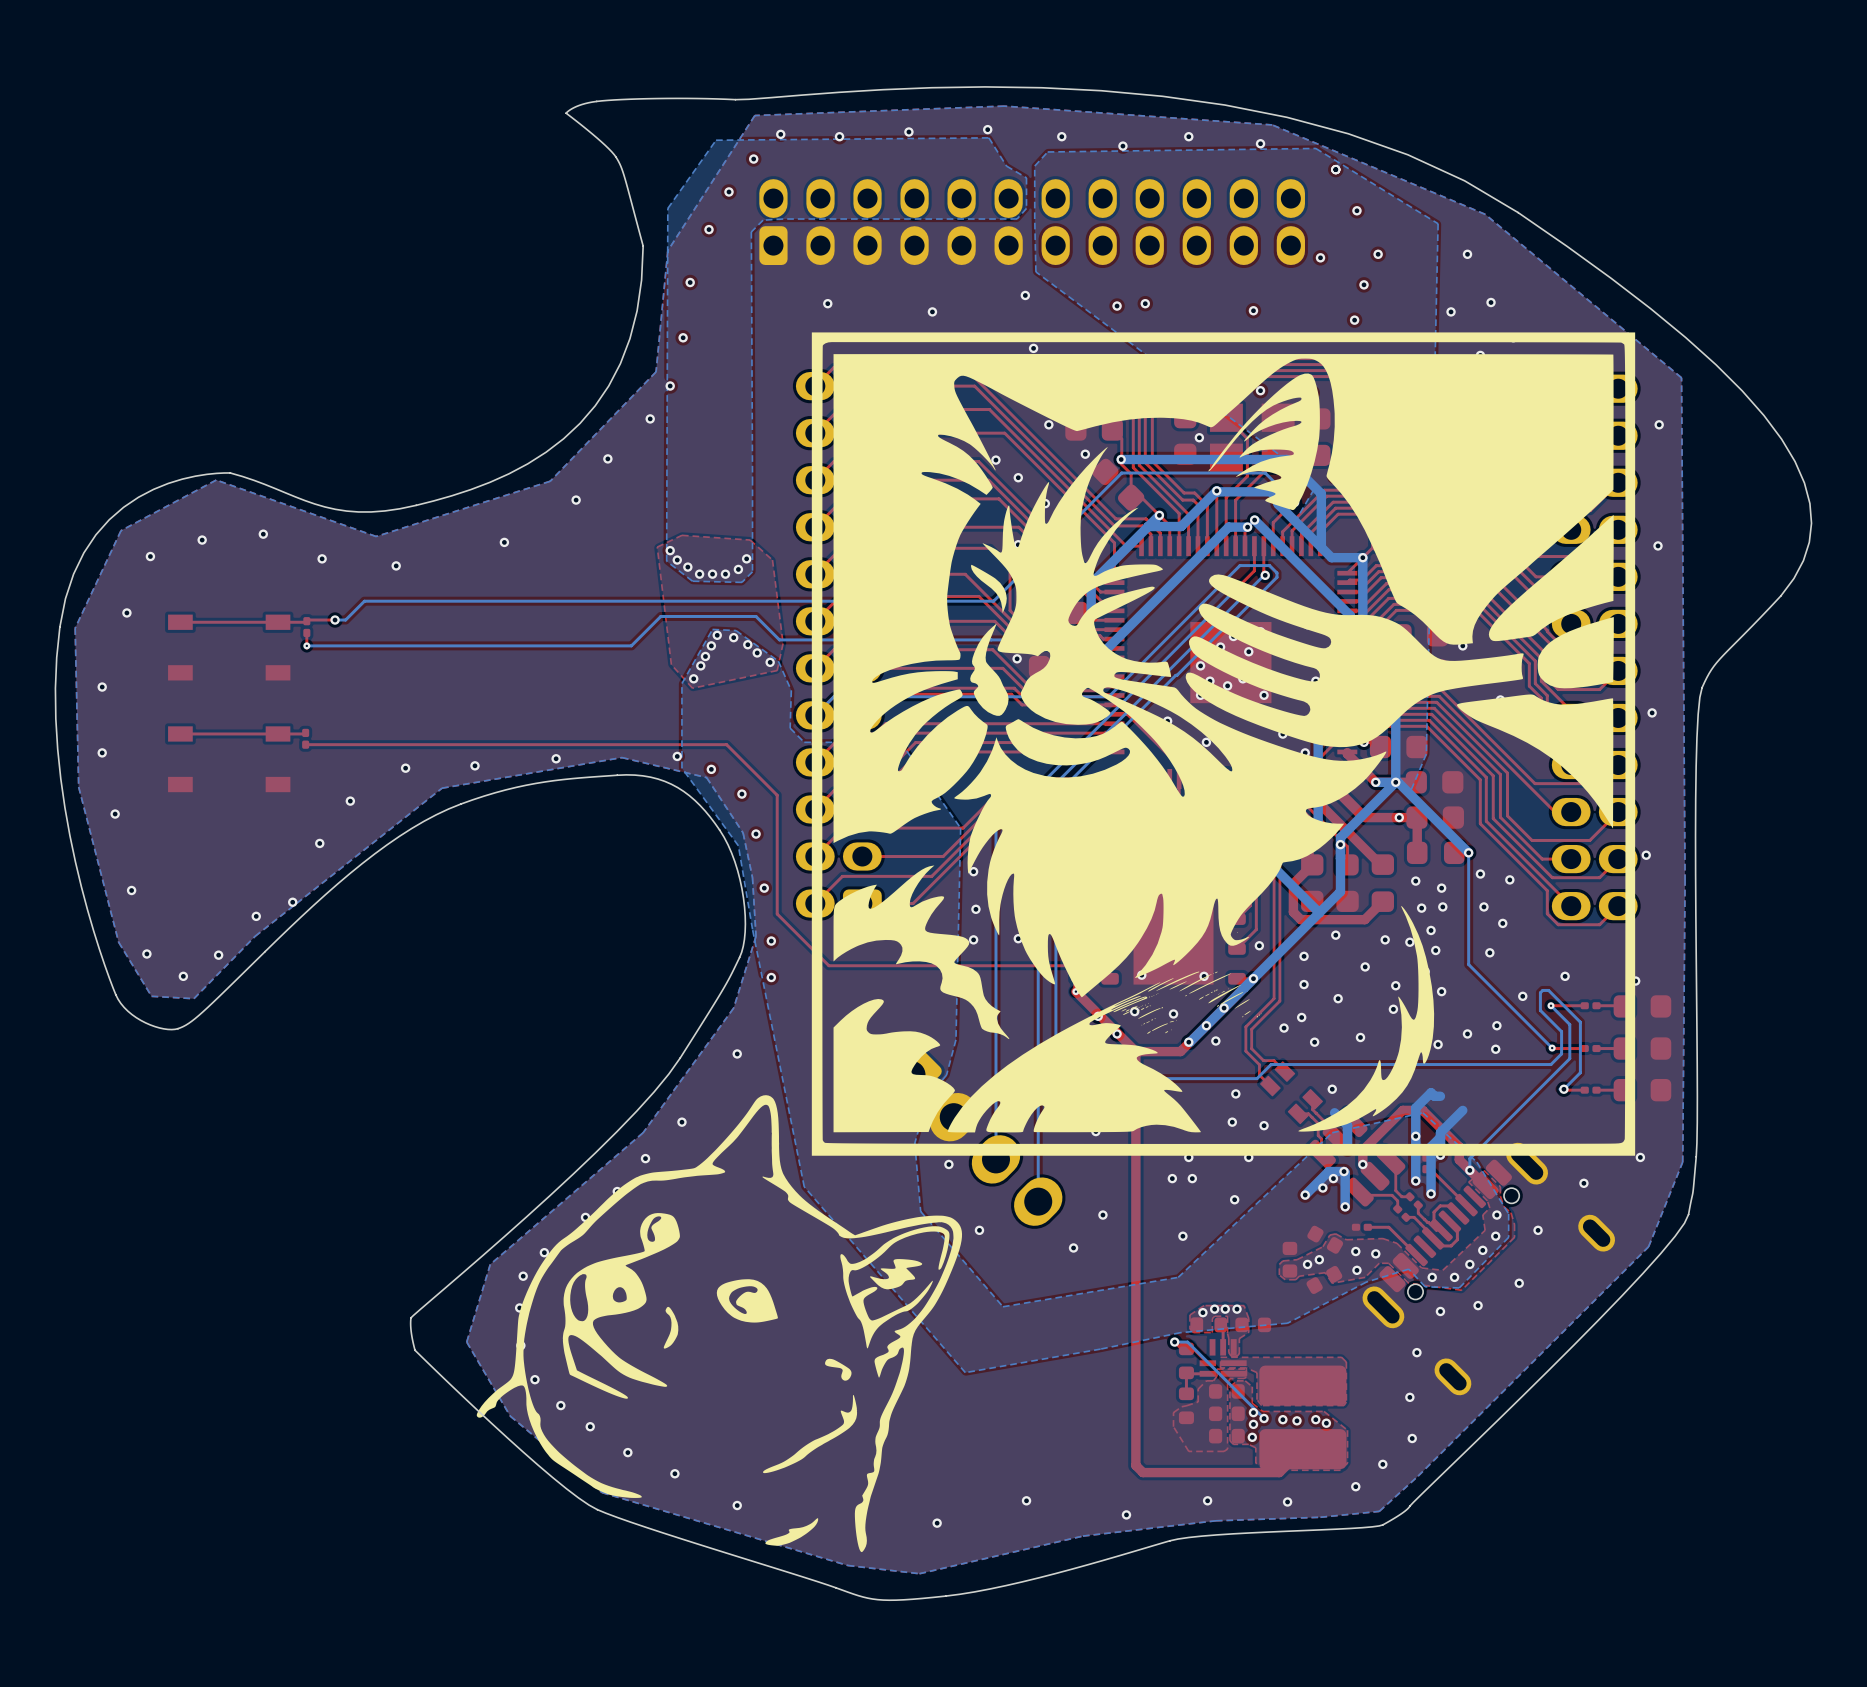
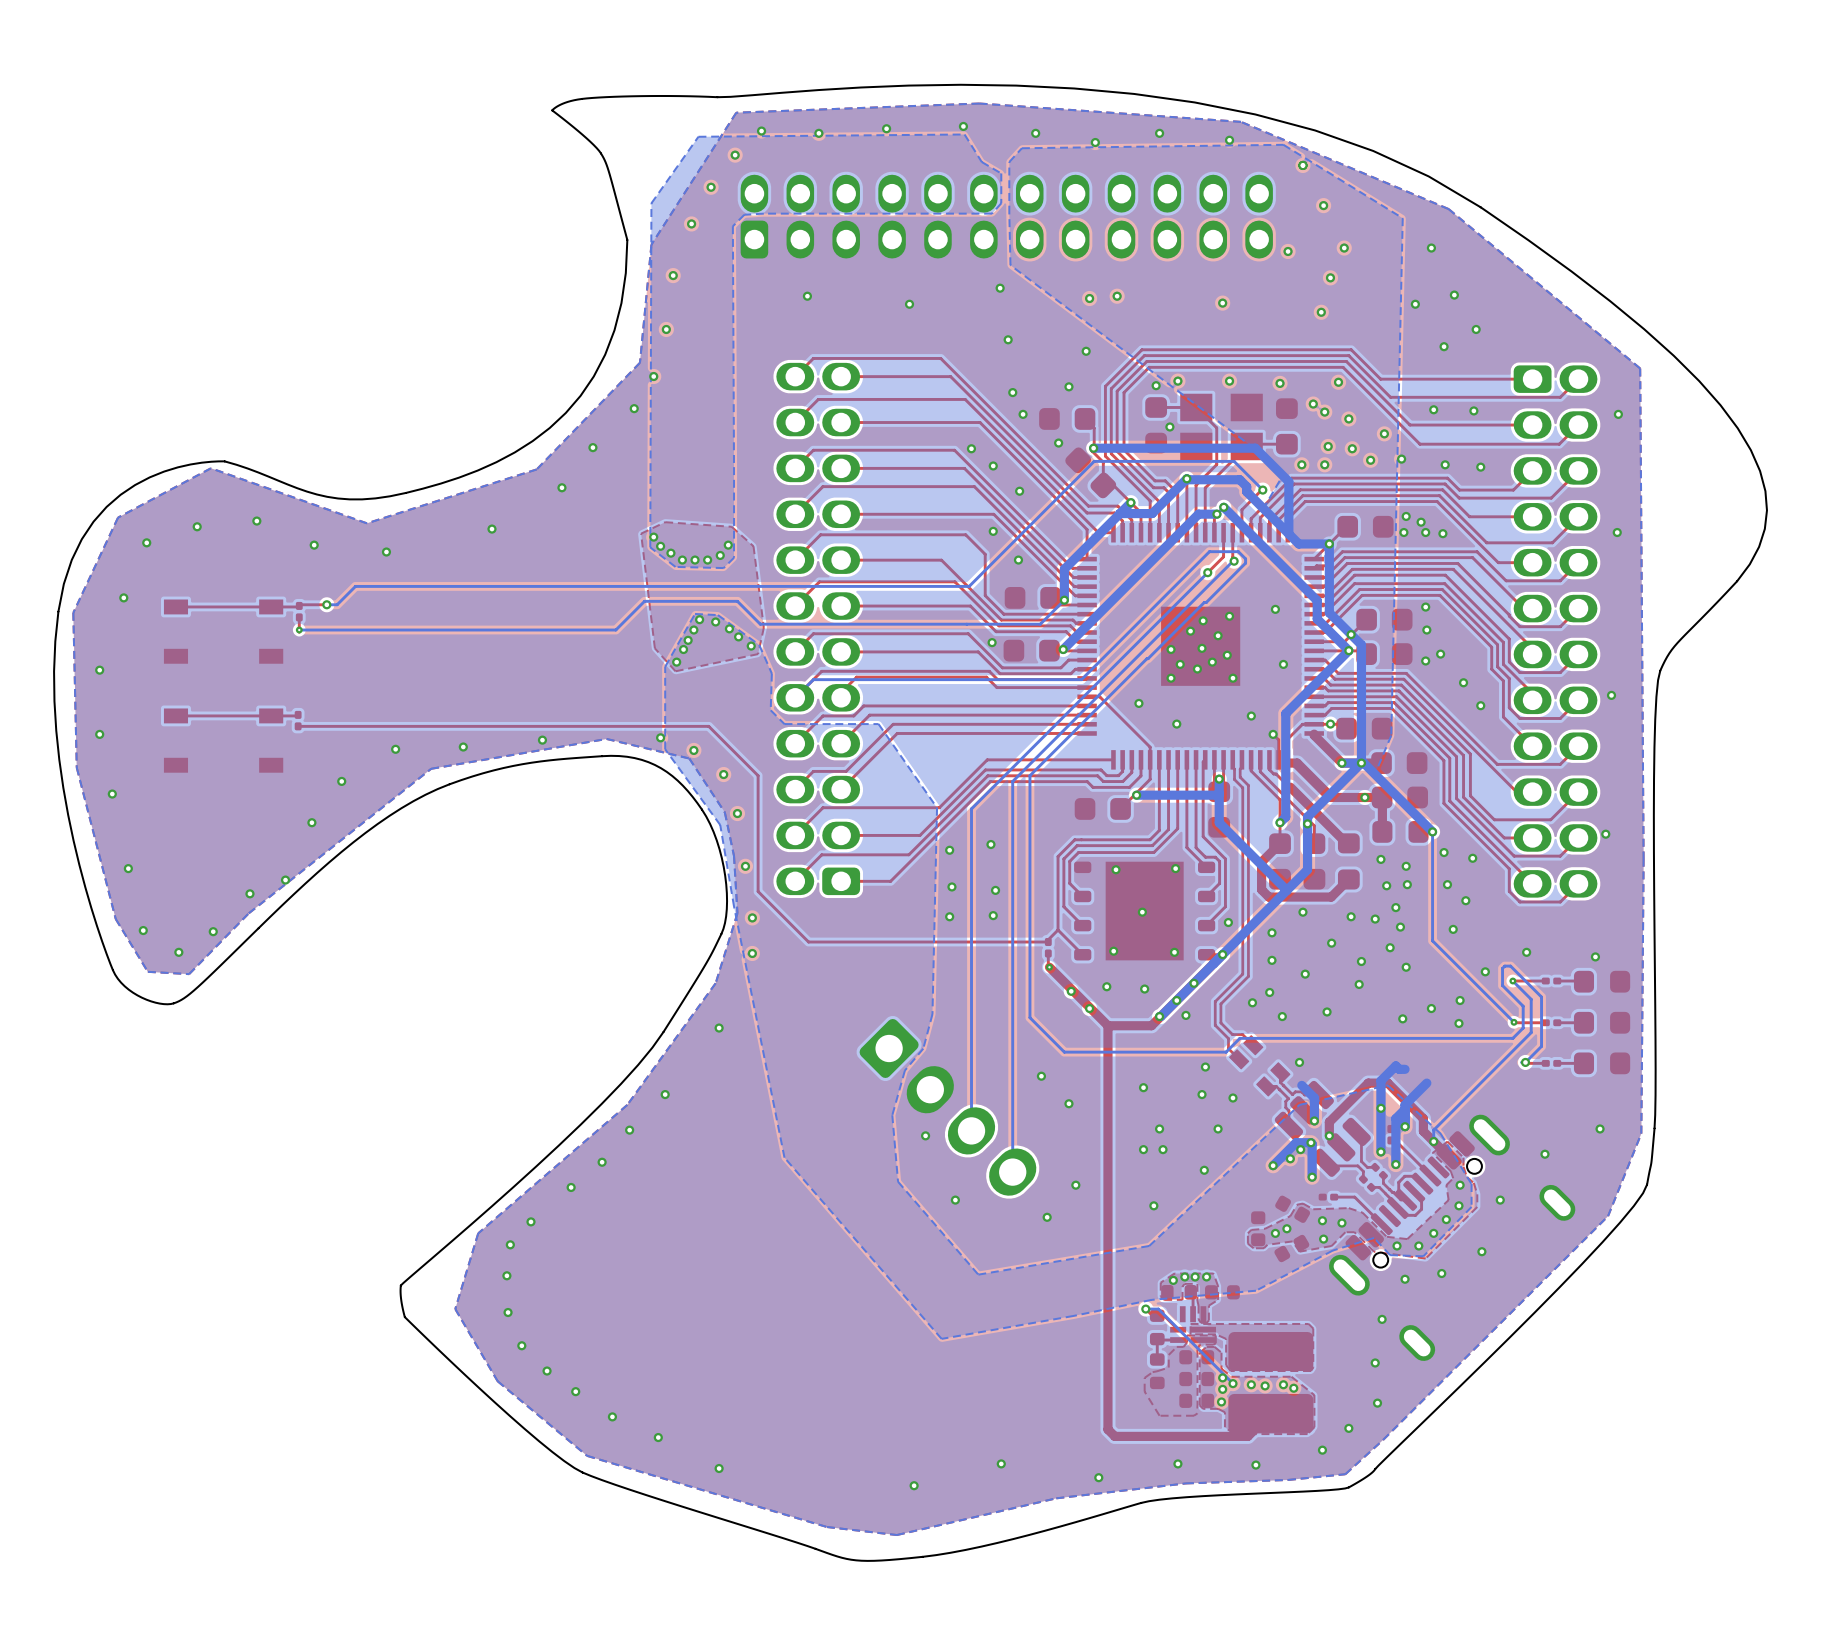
drawing: [476, 332, 1636, 1553] -> none

